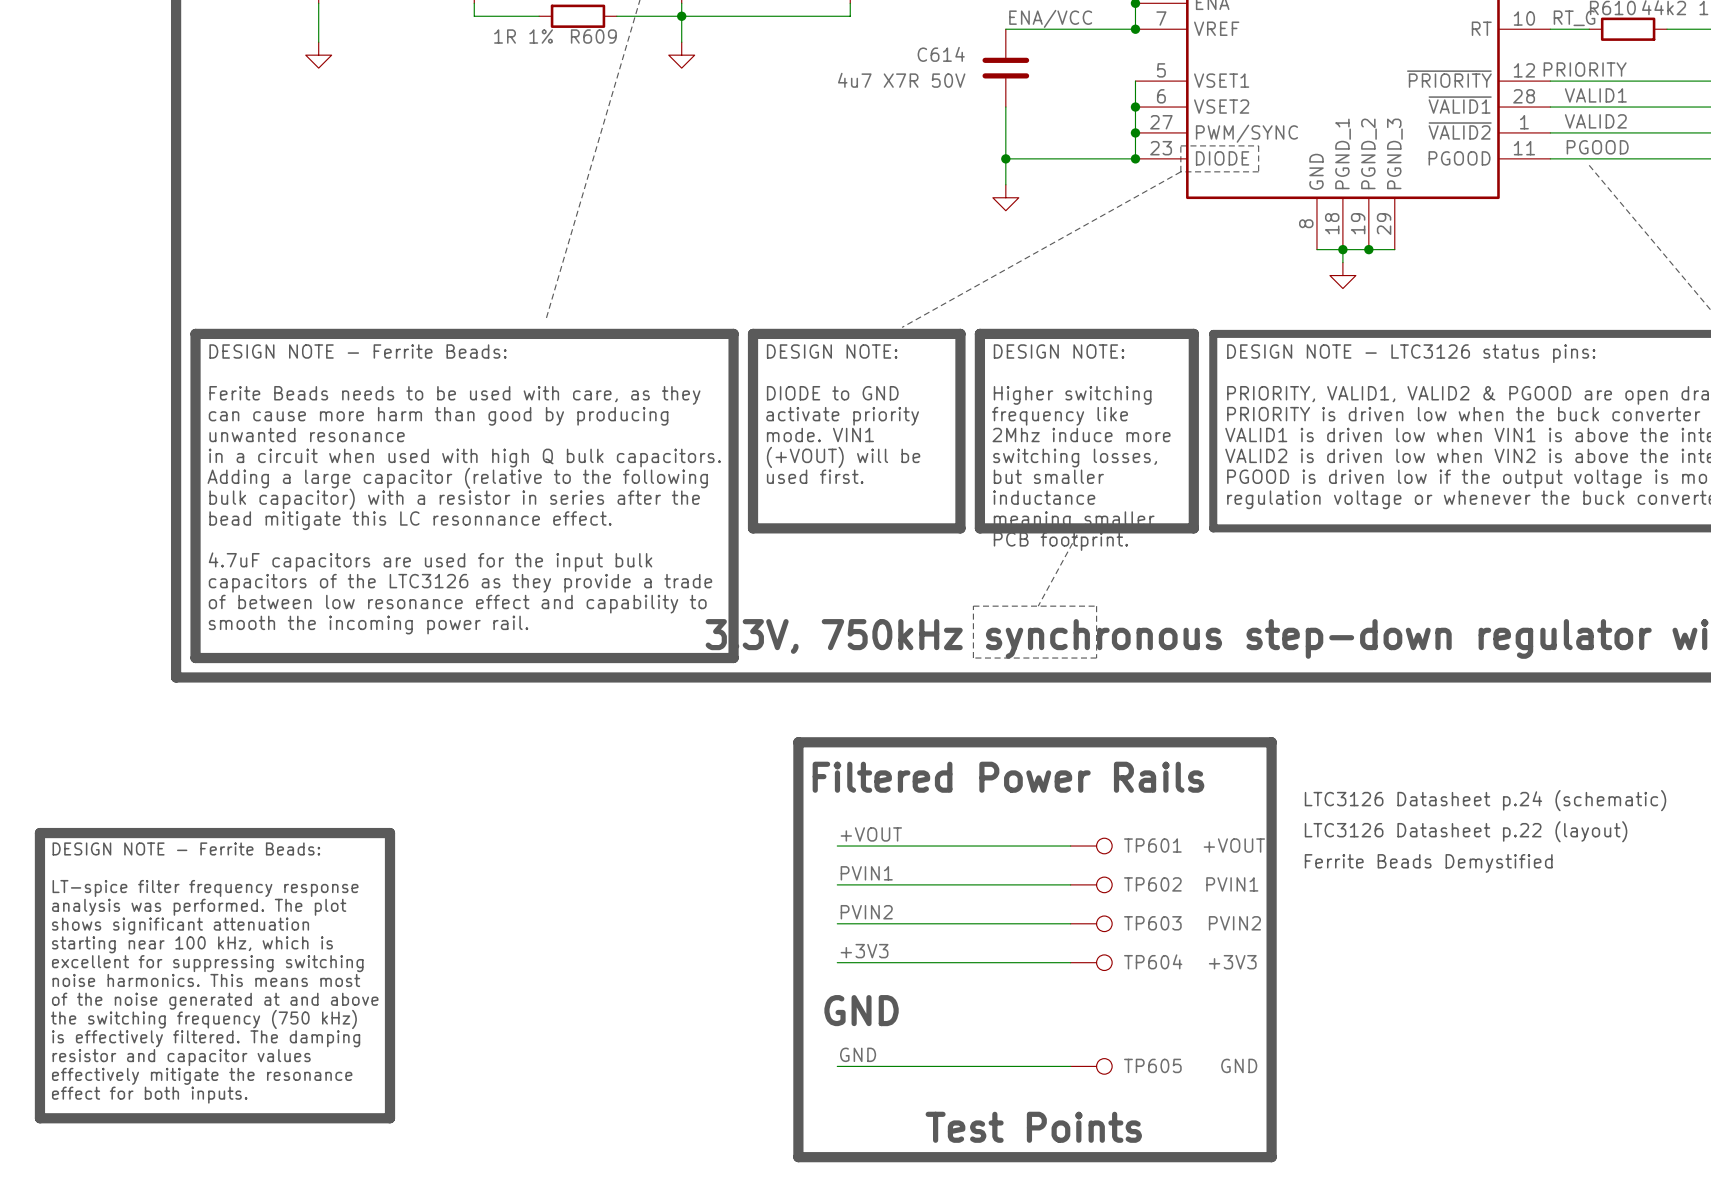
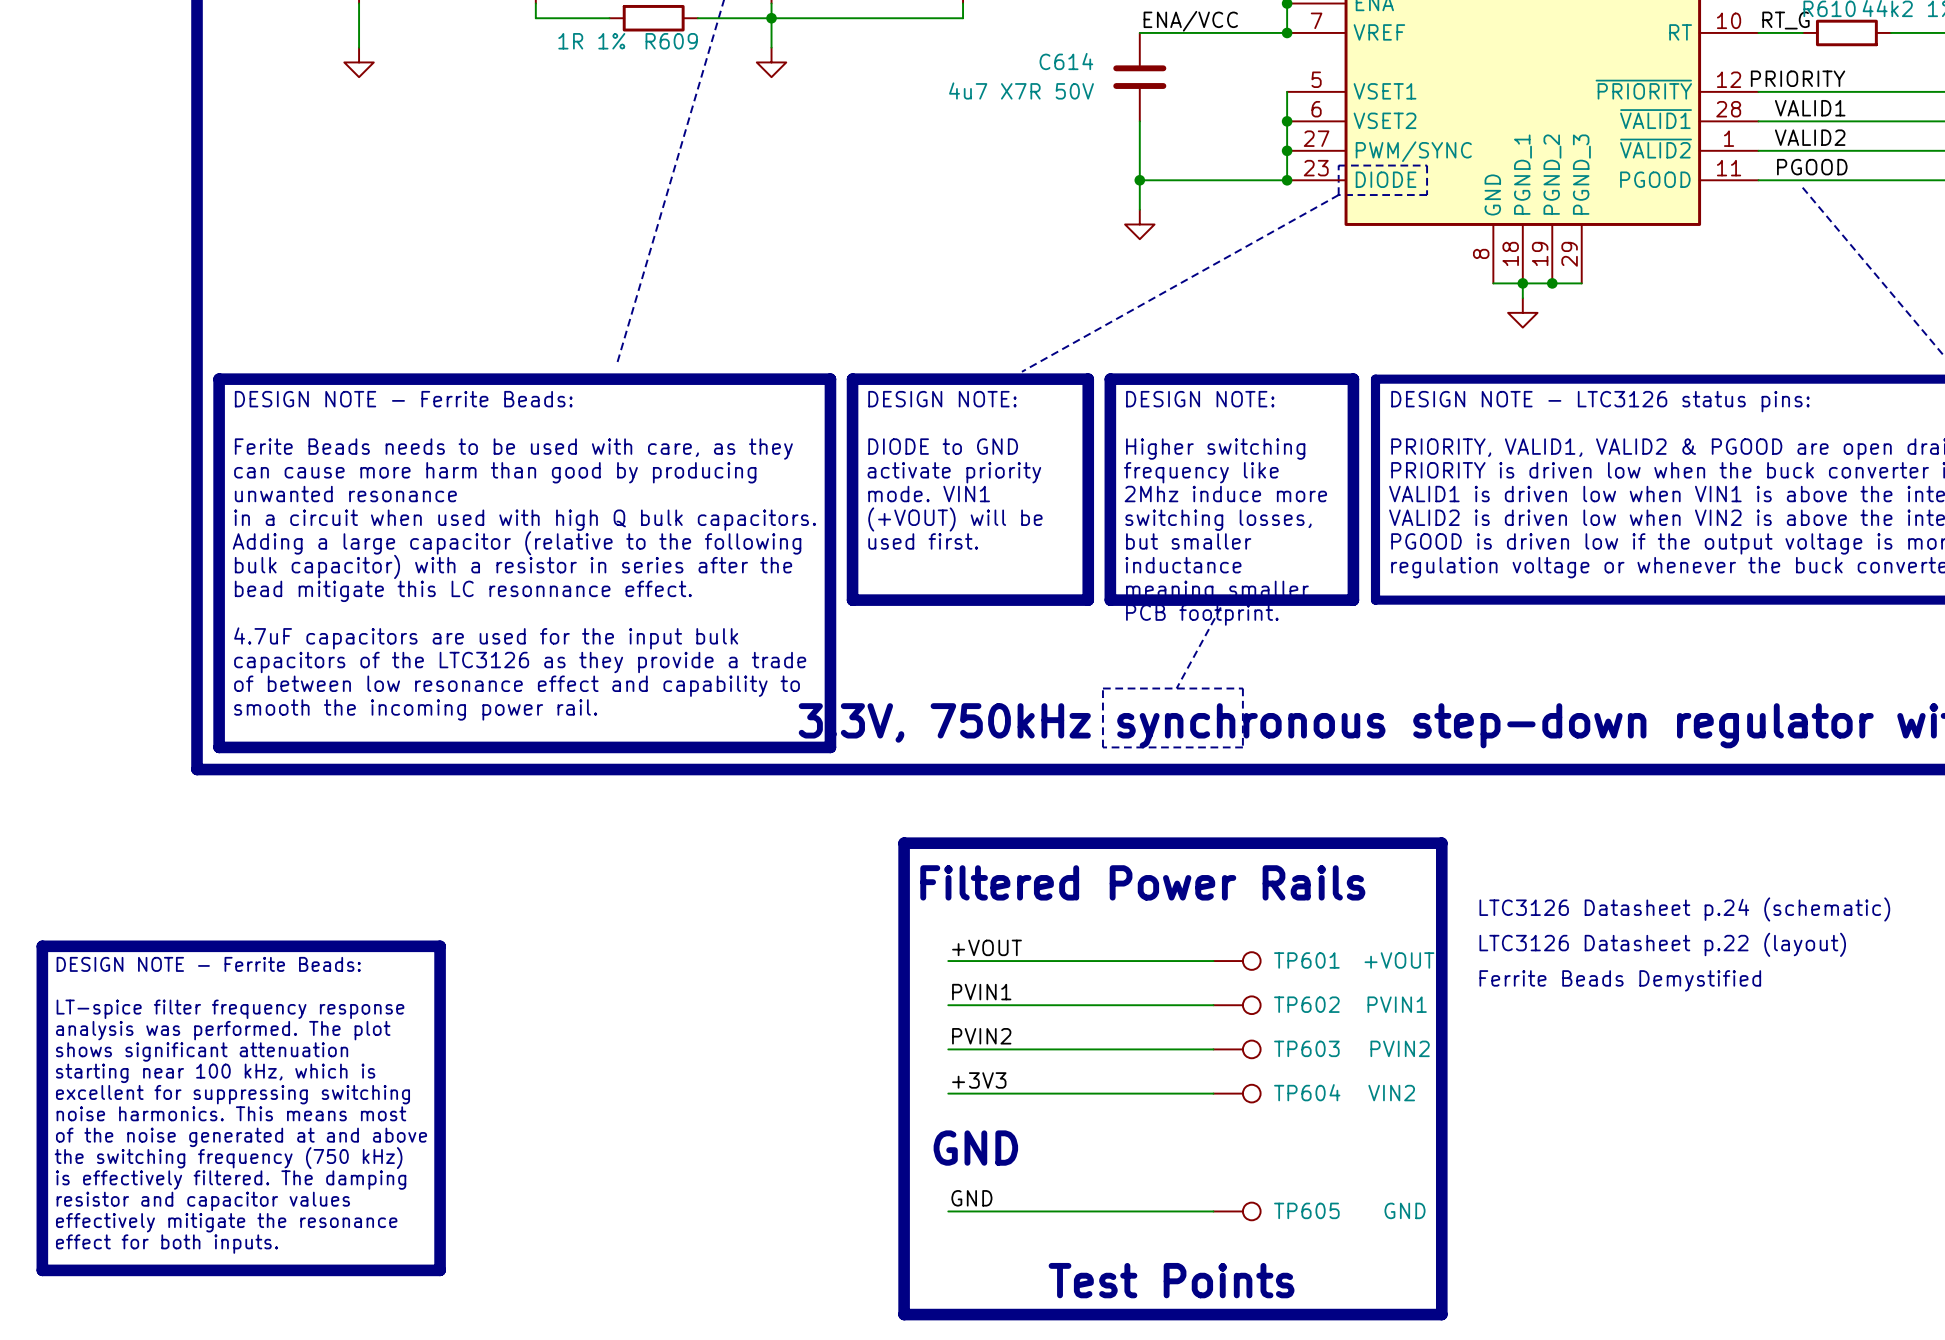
TP604 value: +3V3 (1232, 962) -> VIN2 (1391, 1093)

